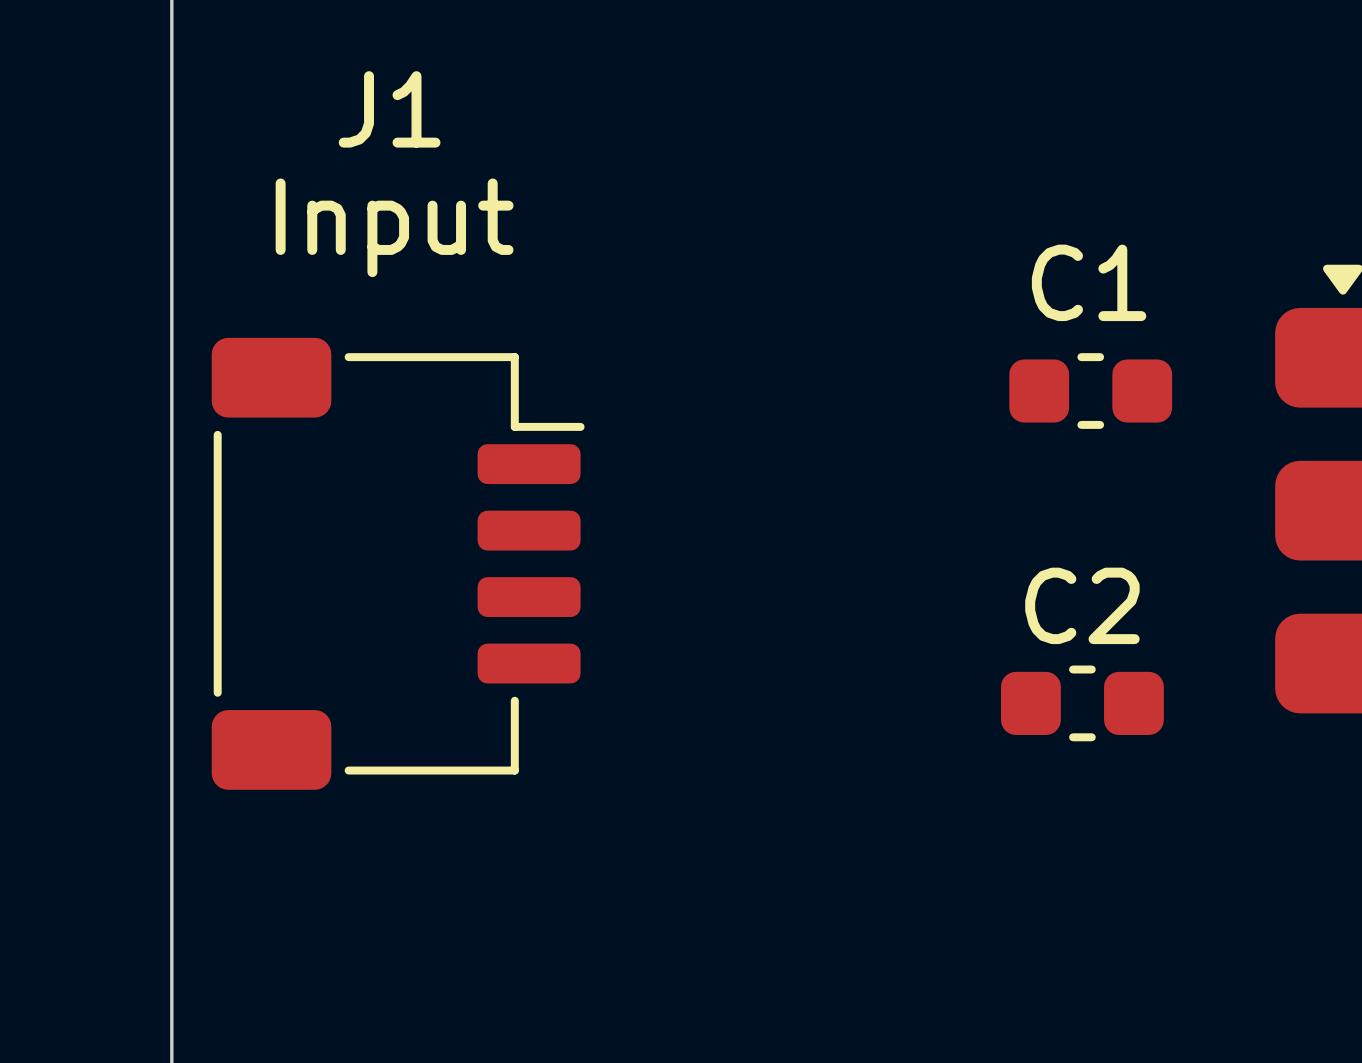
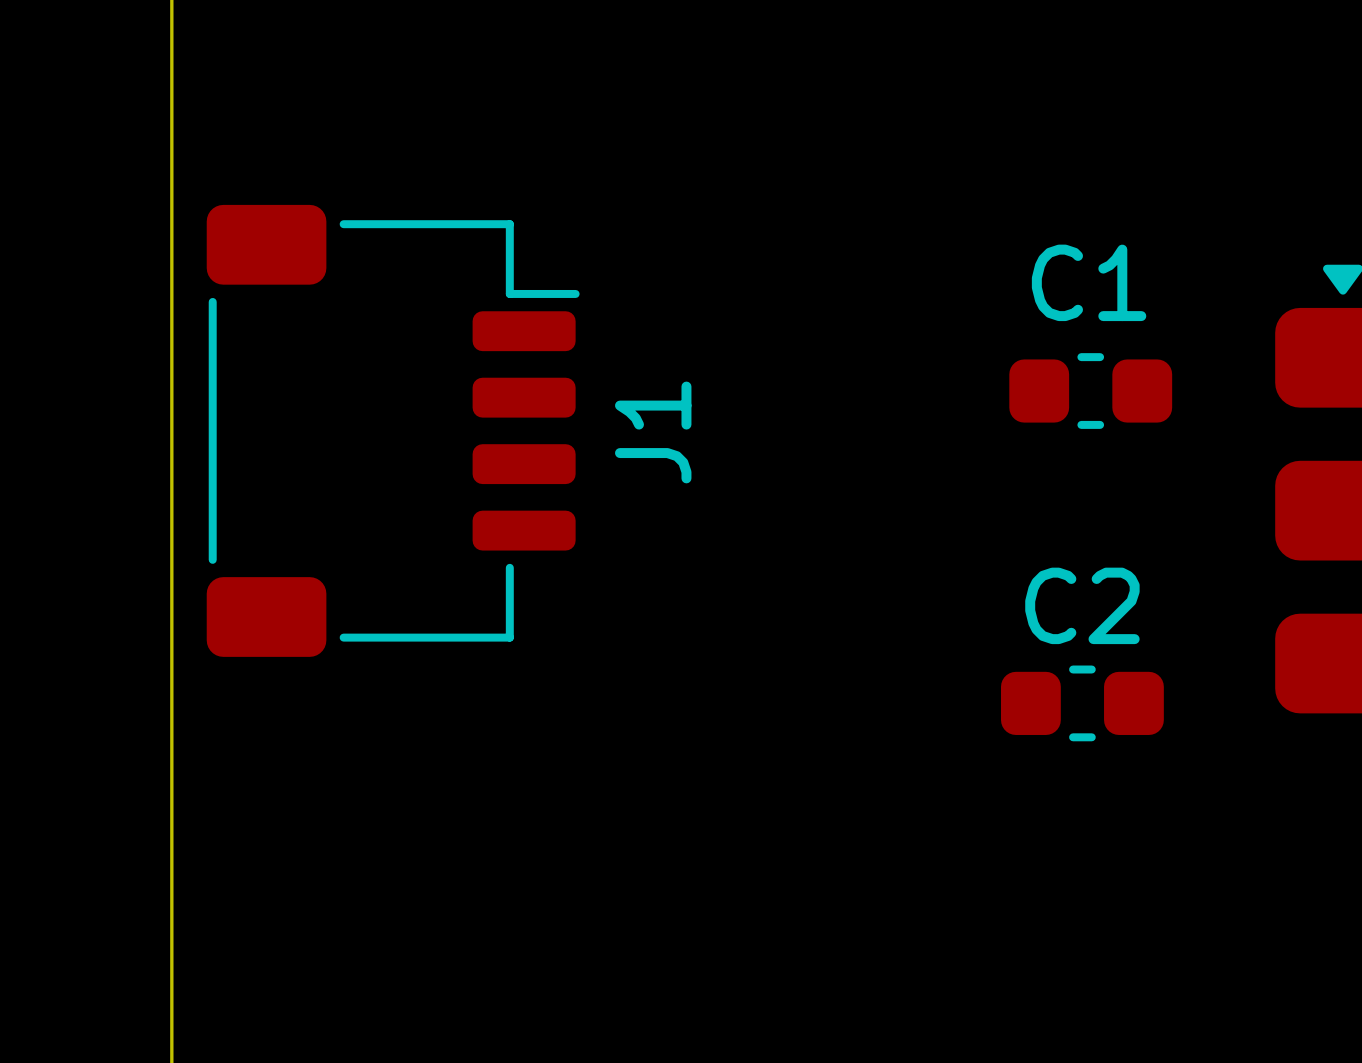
J1 name rotation: 0° (389, 109) -> 90° counterclockwise (653, 432)
J1 name position: J1 (389, 109) -> J1 (653, 432)
text: Input (394, 227) -> none
J1 position: (398, 563) -> (393, 430)

